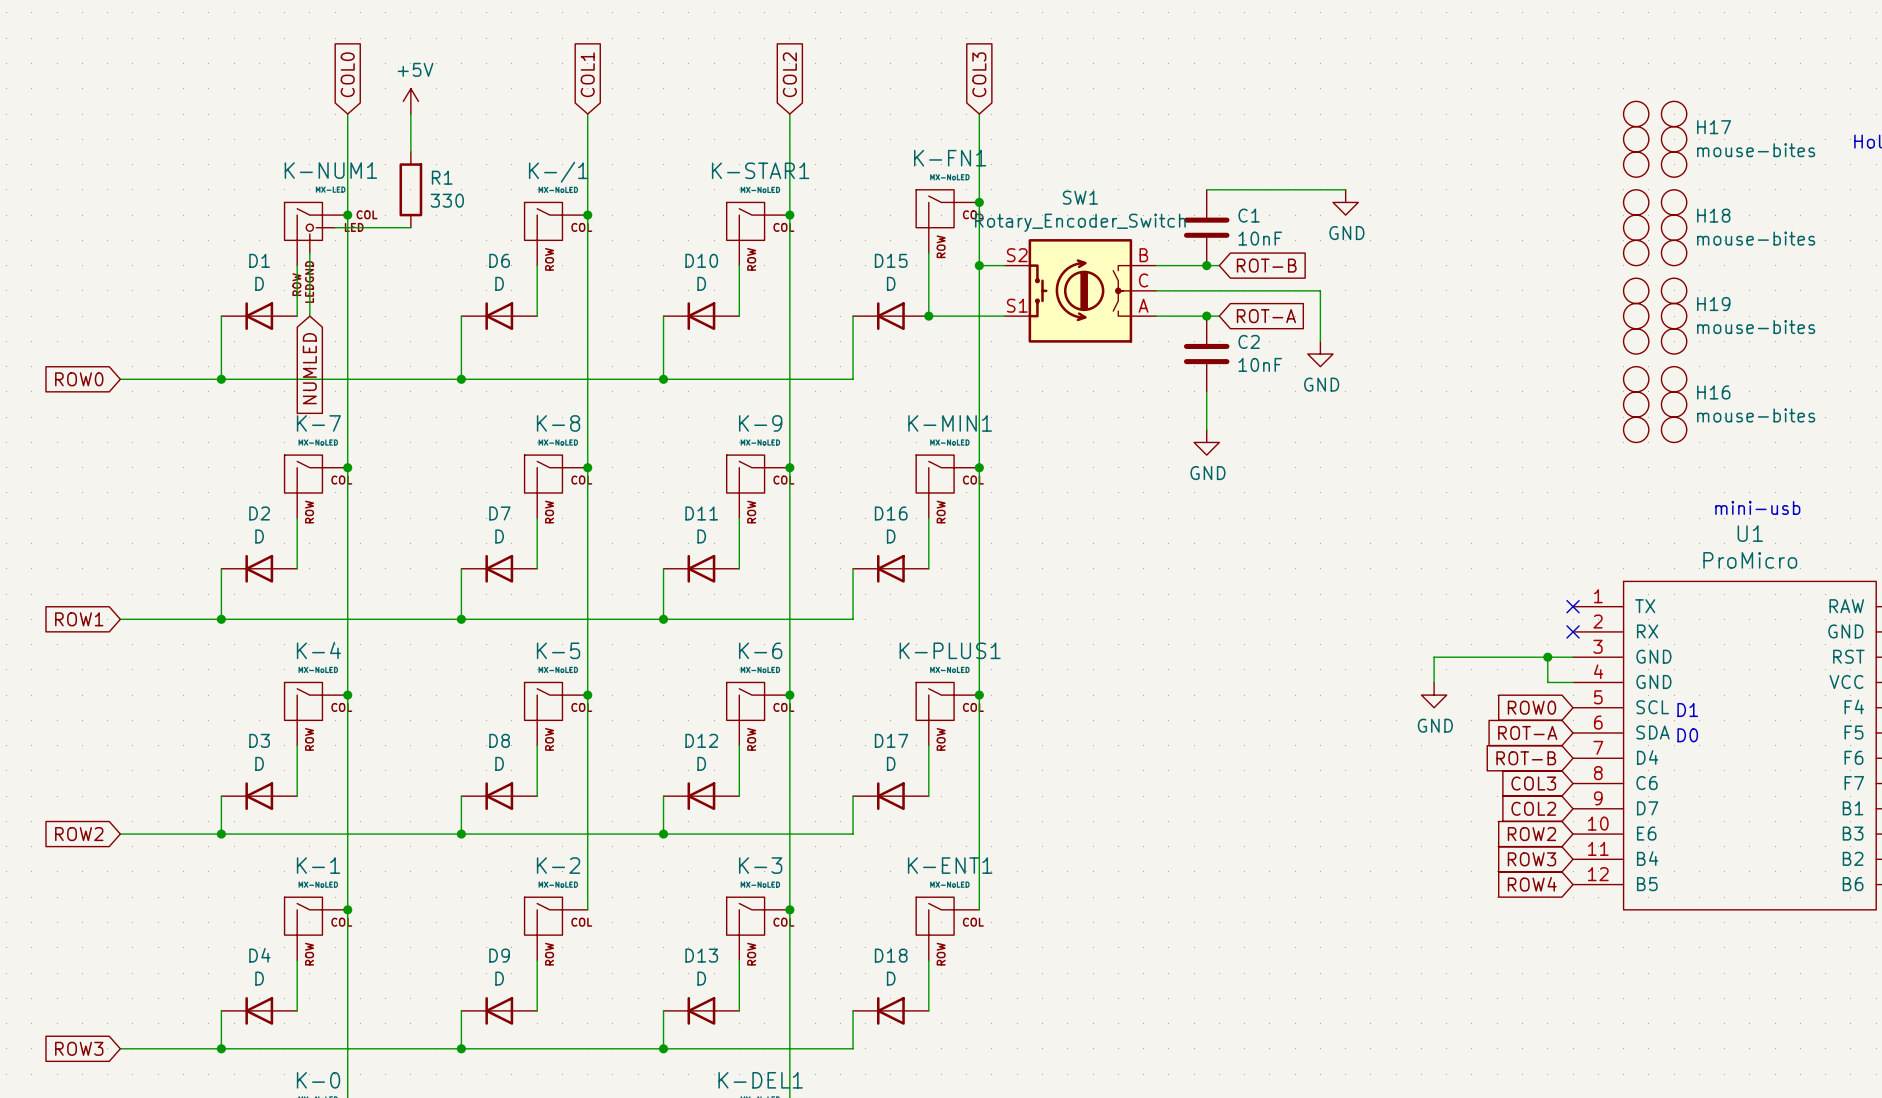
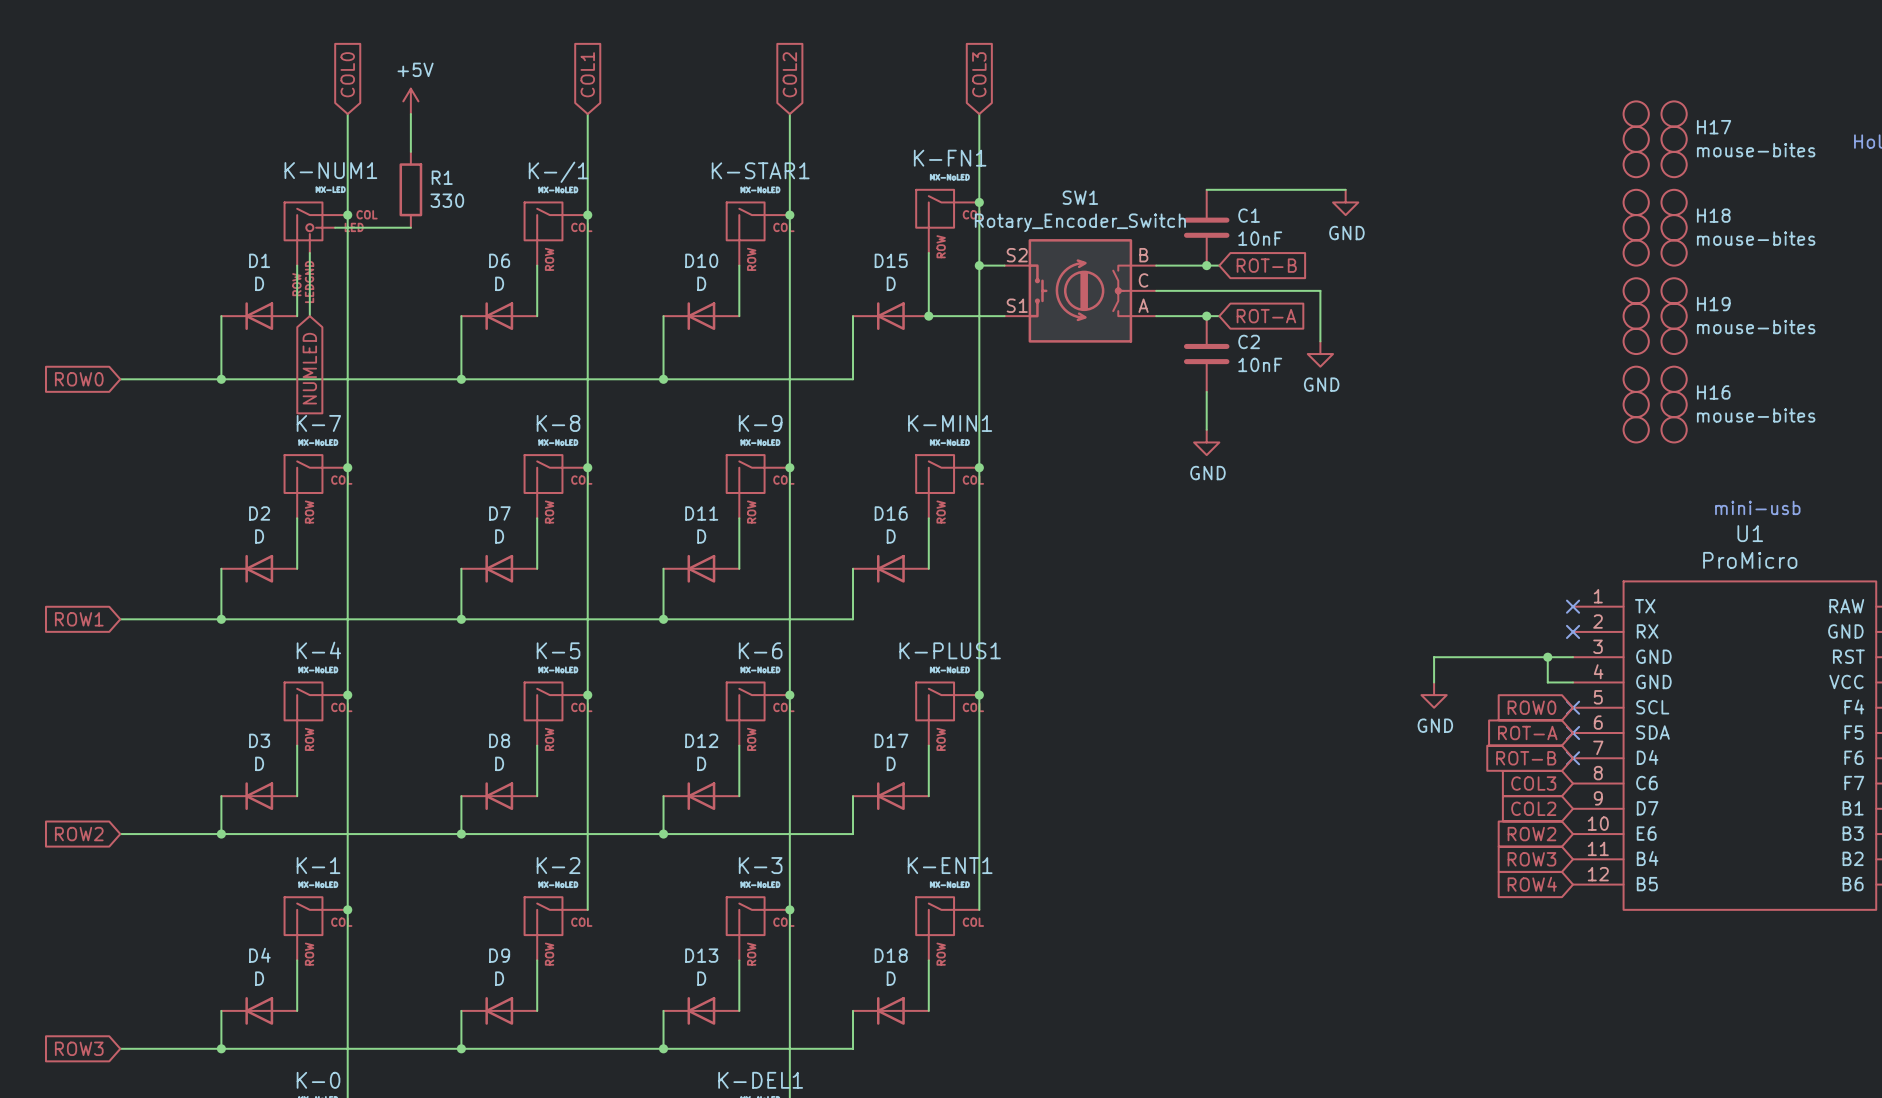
no-connect mark: none -> (1573, 707)
text: D1 (1687, 710) -> none
no-connect mark: none -> (1573, 733)
text: D0 (1687, 735) -> none
no-connect mark: none -> (1573, 758)

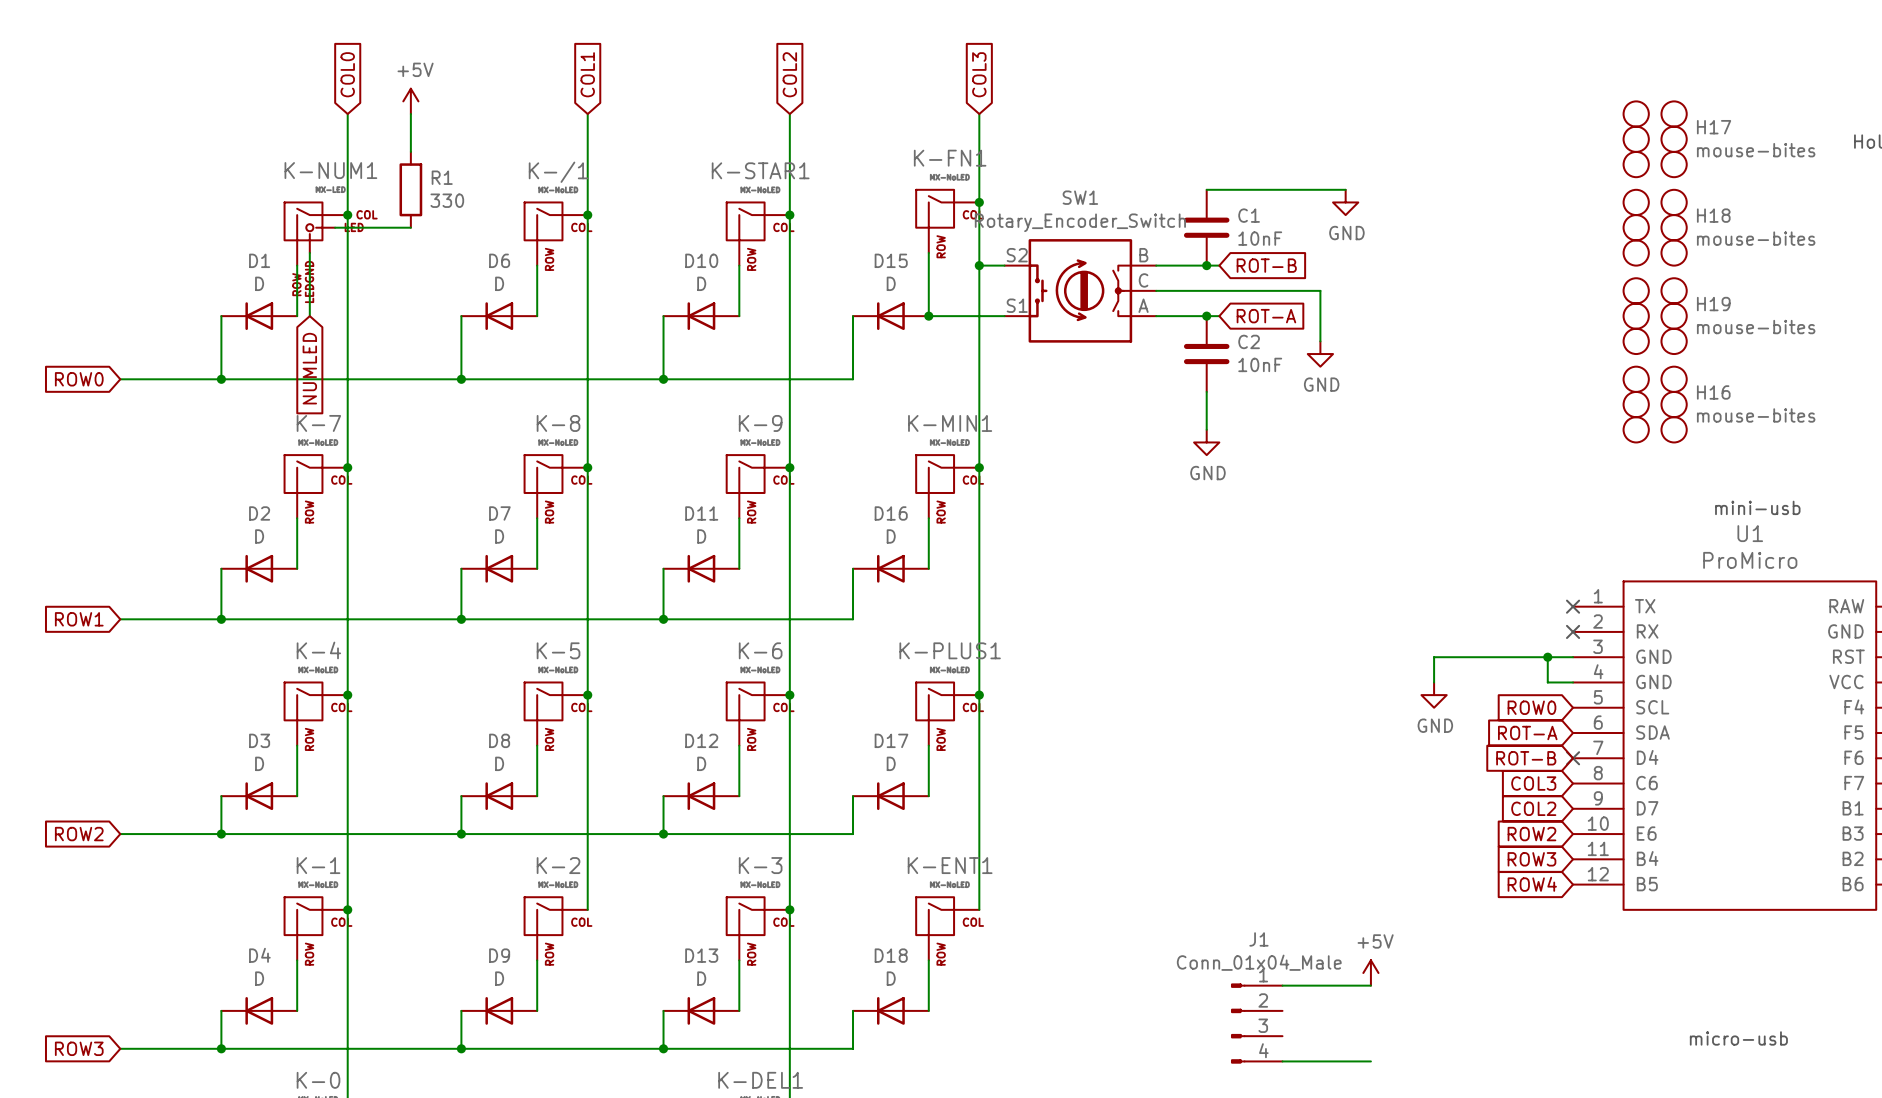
no-connect mark: (1573, 707) -> none
no-connect mark: (1573, 733) -> none
power symbol: none -> +5V (1370, 973)
wire: none -> (1282, 985) (1370, 985)
J1: none -> Conn_01x04_Male (1256, 1023)
text: none -> micro-usb (1738, 1038)
wire: none -> (1282, 1061) (1370, 1061)

